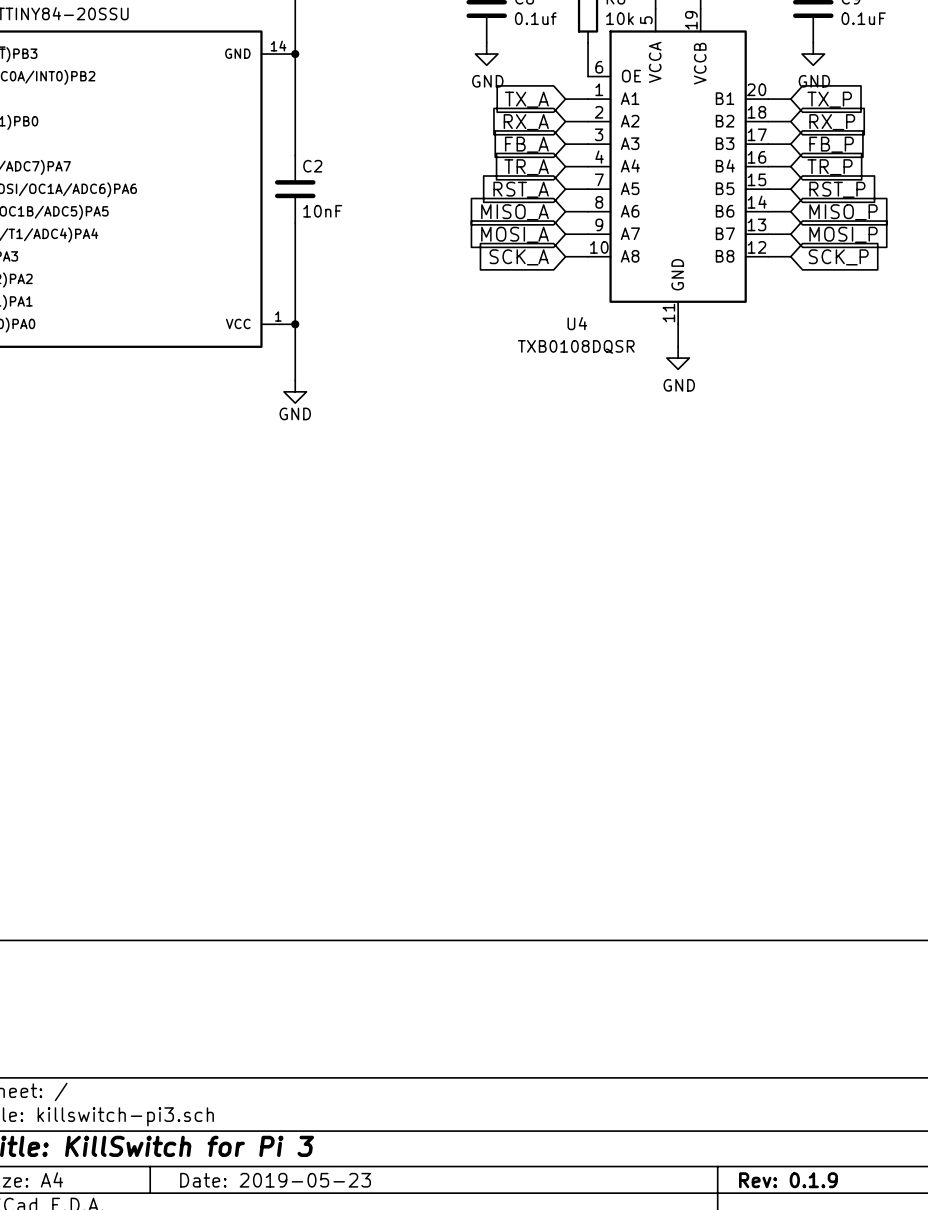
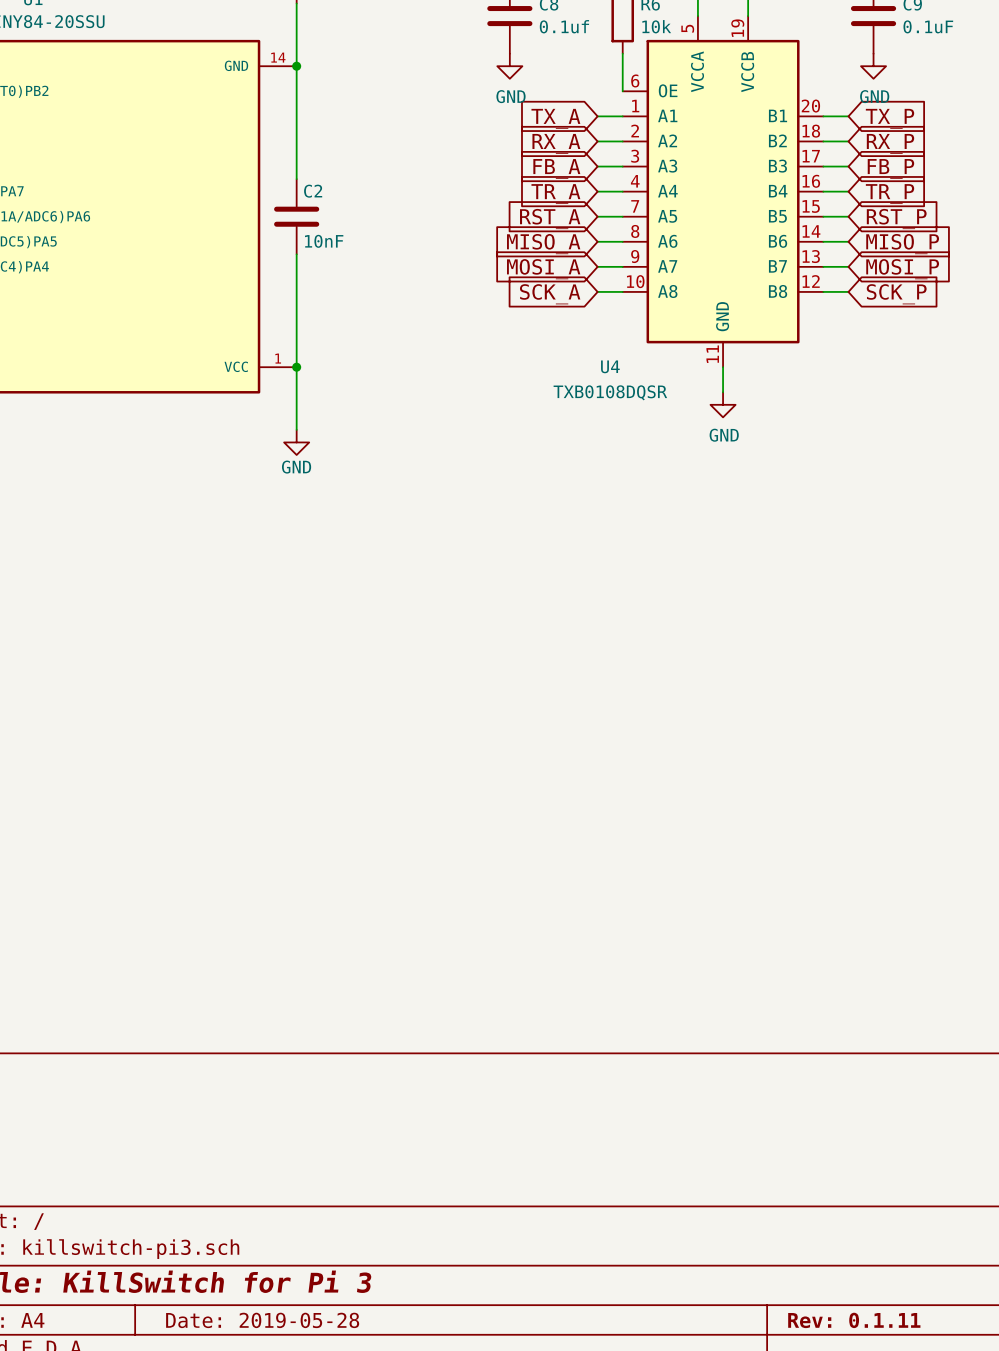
title block: Date: 2019-05-23 (275, 1180) -> Date: 2019-05-28 (262, 1320)
title block: Rev: 0.1.9 (788, 1180) -> Rev: 0.1.11 (854, 1320)

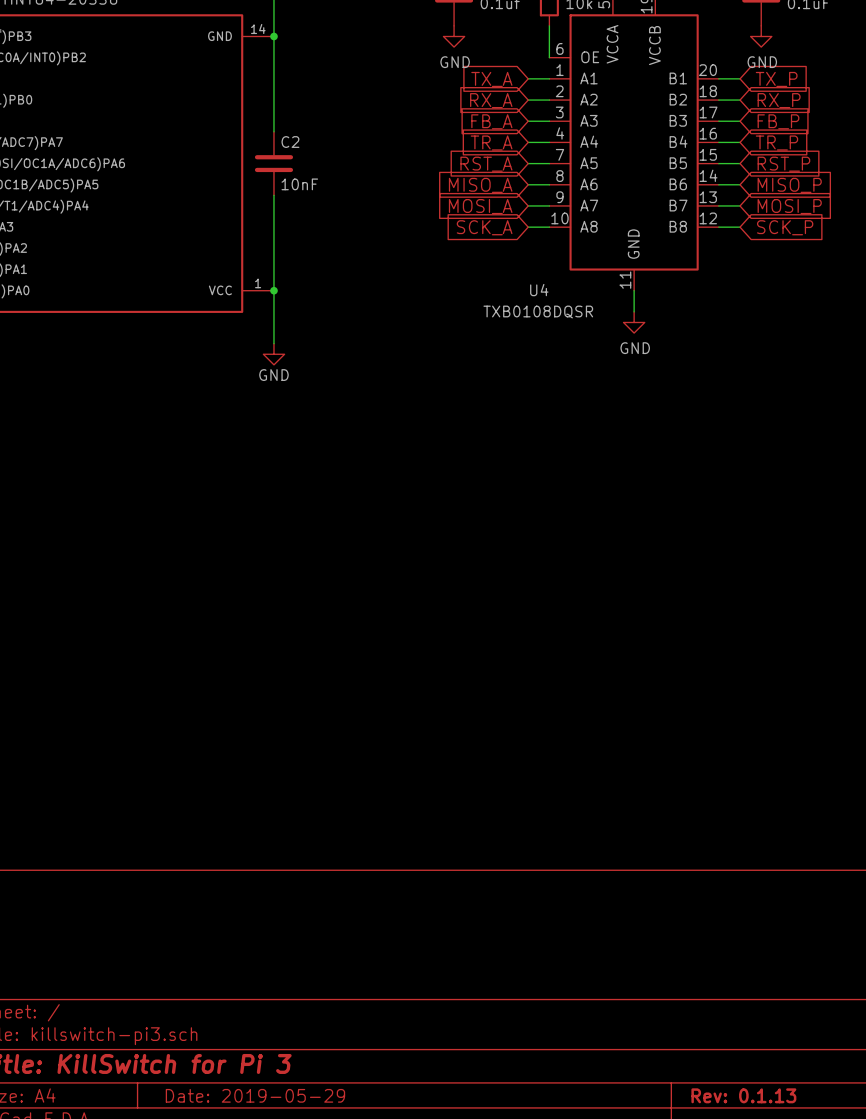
title block: Date: 2019-05-28 (262, 1320) -> Date: 2019-05-29 (255, 1095)
title block: Rev: 0.1.11 (854, 1320) -> Rev: 0.1.13 (743, 1095)

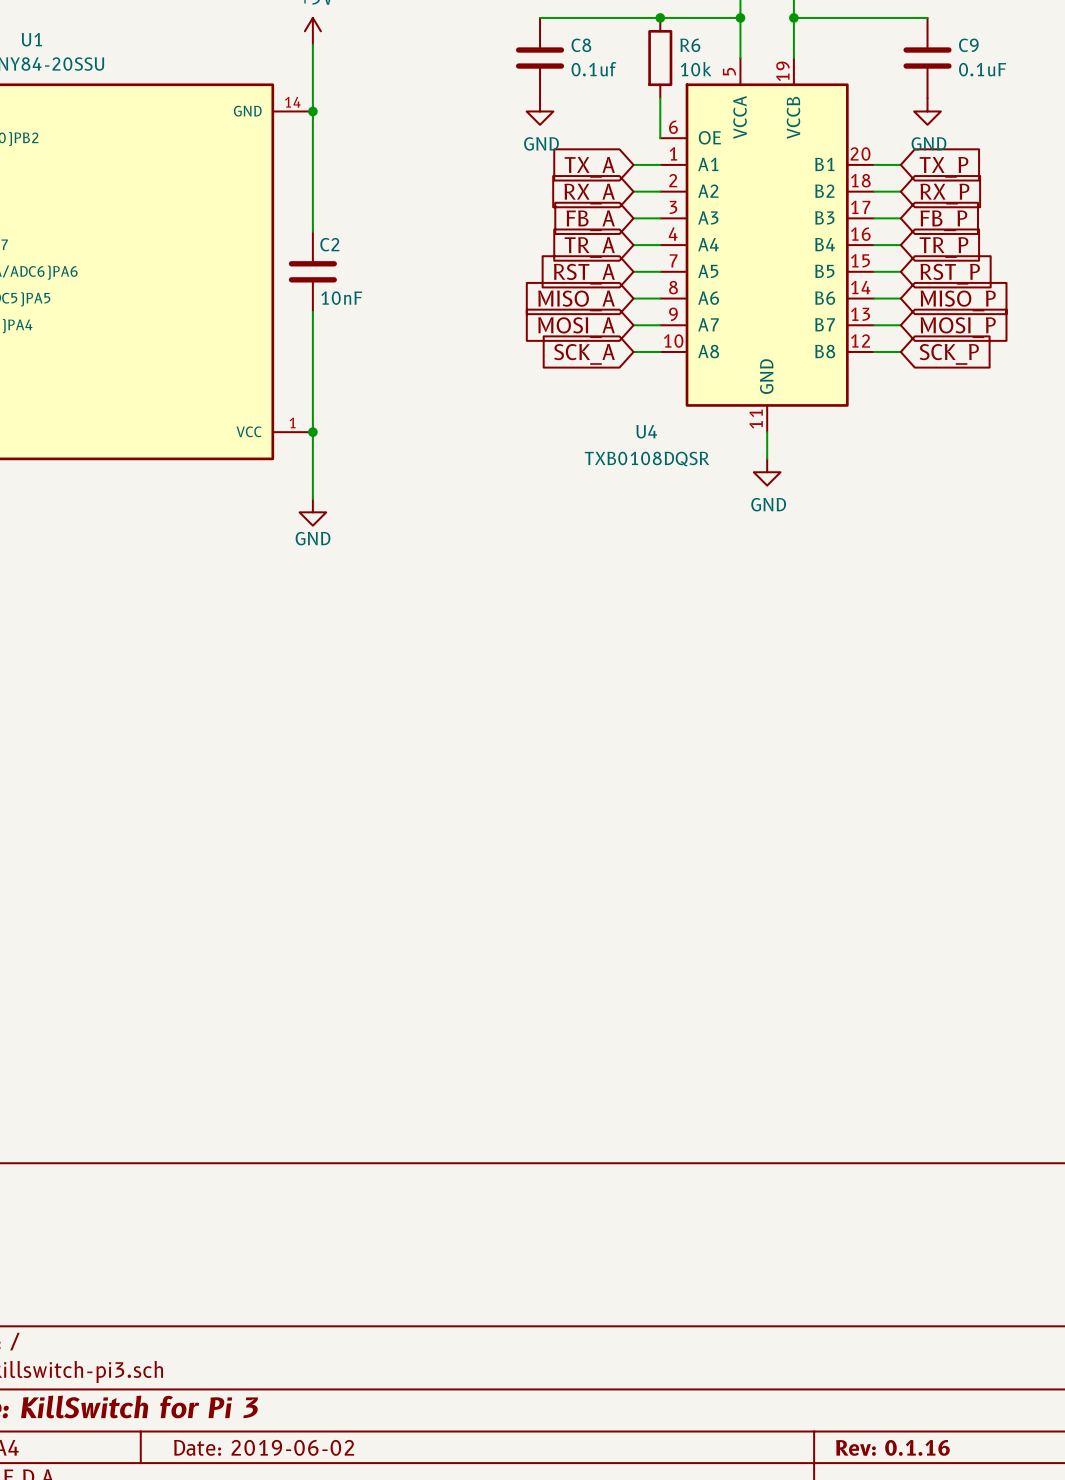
title block: Date: 2019-05-29 (255, 1095) -> Date: 2019-06-02 (264, 1447)
title block: Rev: 0.1.13 (743, 1095) -> Rev: 0.1.16 (892, 1447)

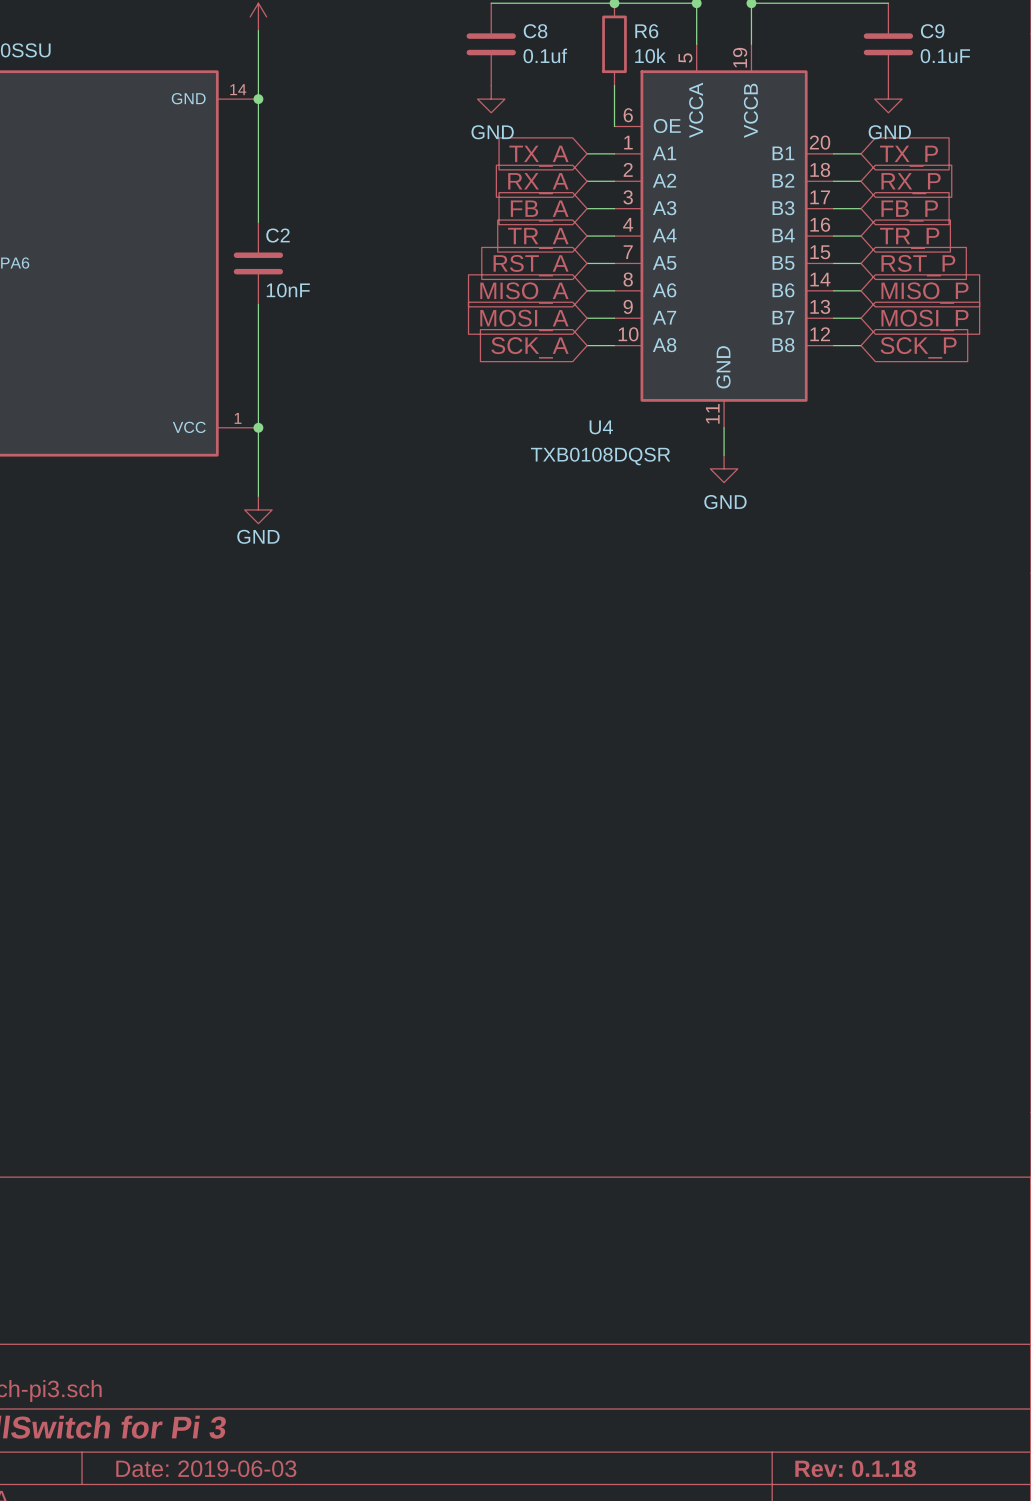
title block: Date: 2019-06-02 (264, 1447) -> Date: 2019-06-03 (206, 1468)
title block: Rev: 0.1.16 (892, 1447) -> Rev: 0.1.18 (855, 1468)

